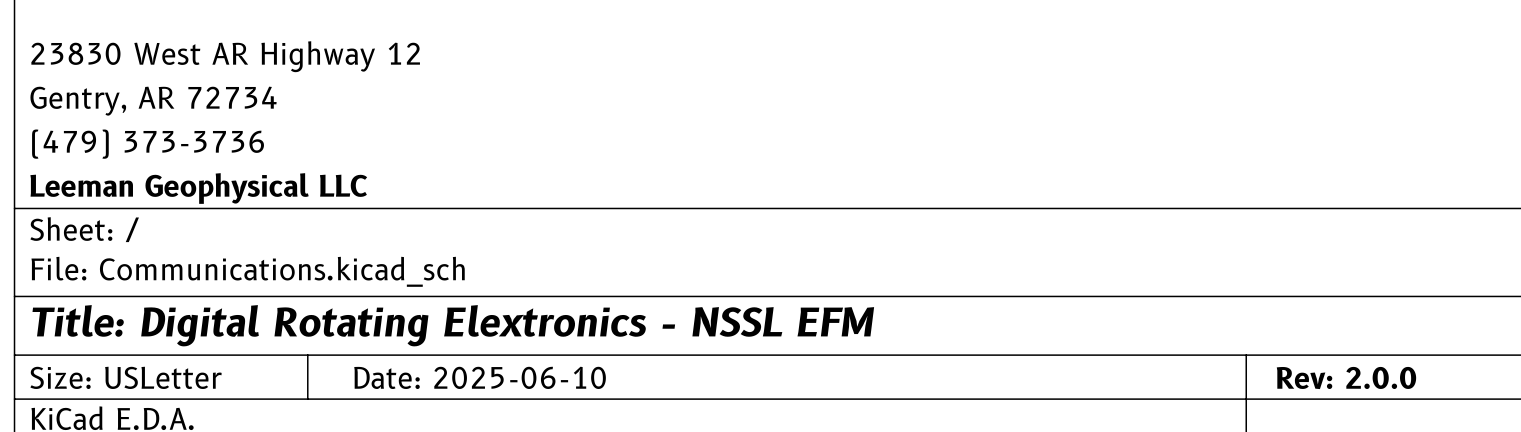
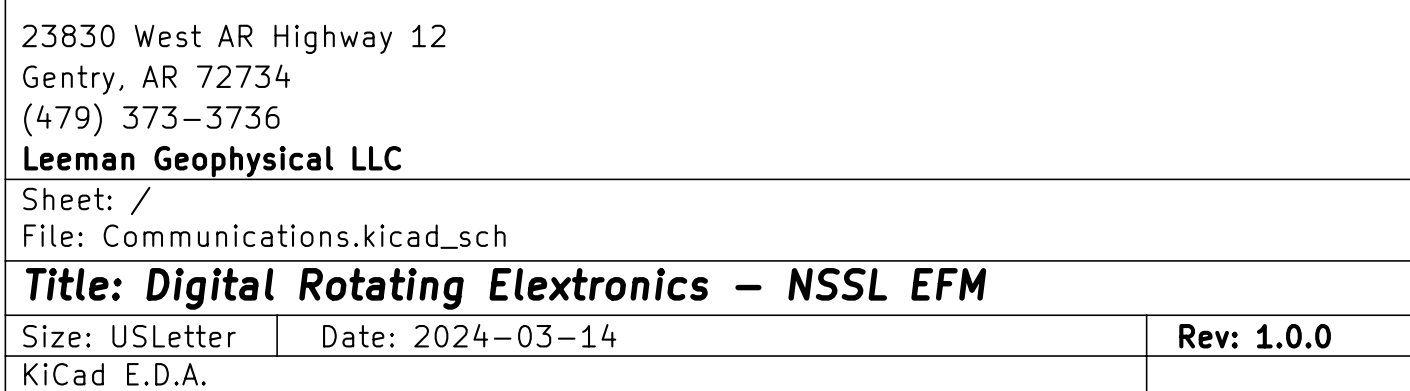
title block: Date: 2025-06-10 (480, 377) -> Date: 2024-03-14 (469, 335)
title block: Rev: 2.0.0 (1346, 377) -> Rev: 1.0.0 (1255, 336)

